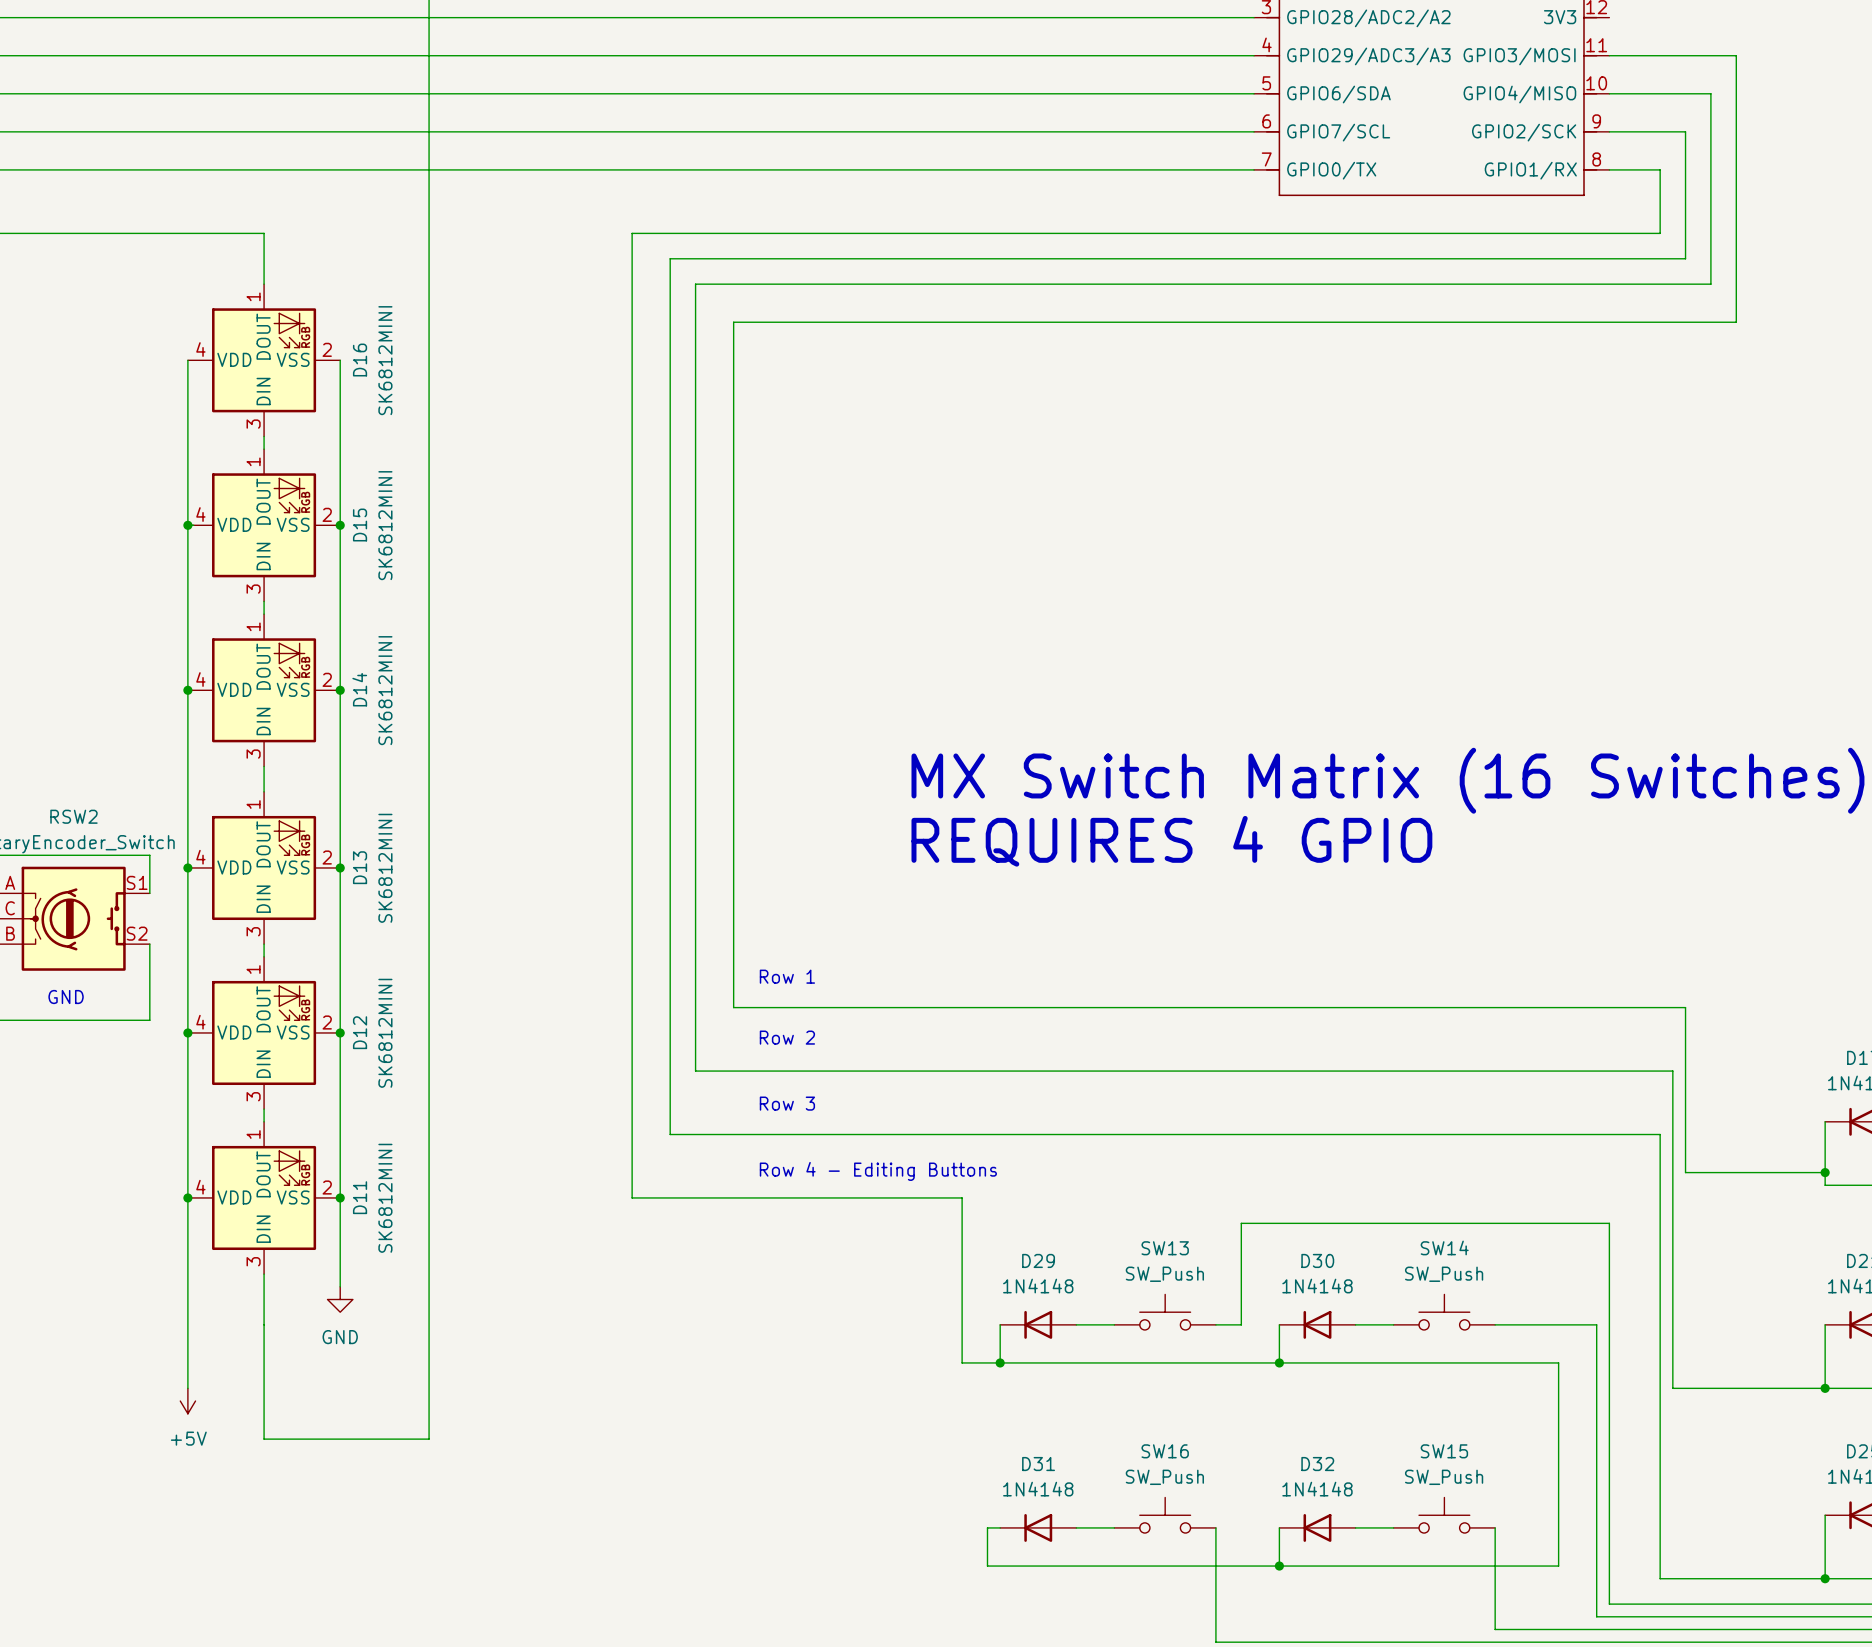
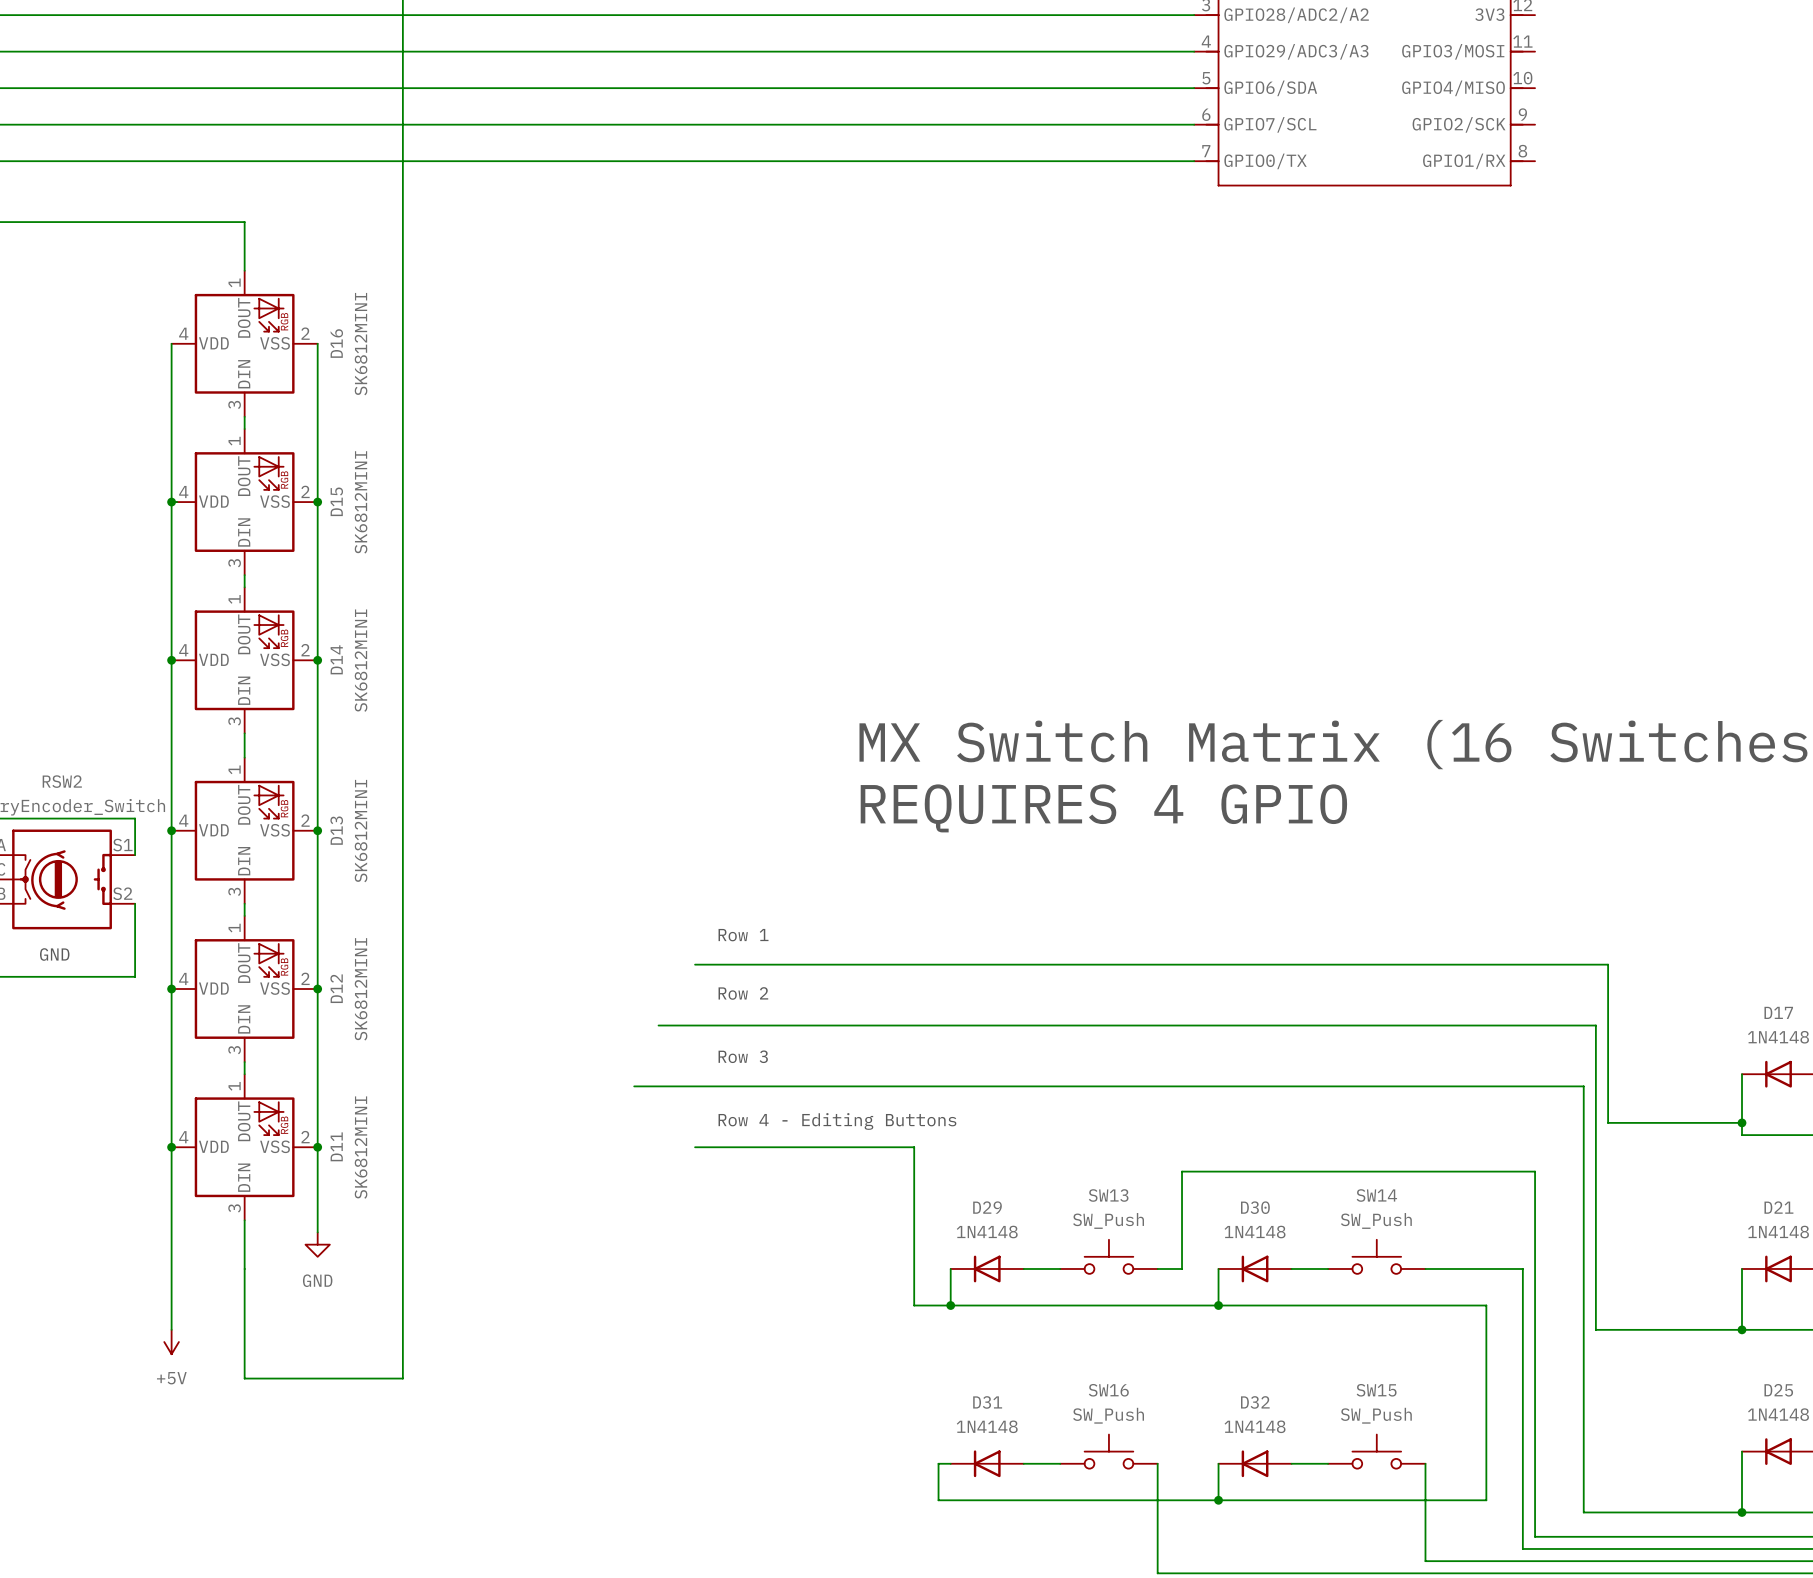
wire: (1609, 55) (1736, 55) (1736, 322) (733, 322) (733, 1007) -> none
wire: (1609, 93) (1710, 93) (1710, 284) (695, 284) (695, 1071) -> none
wire: (1609, 131) (1685, 131) (1685, 258) (670, 258) (670, 1134) -> none
wire: (1609, 169) (1660, 169) (1660, 233) (632, 233) (632, 1197) (733, 1197) -> none

